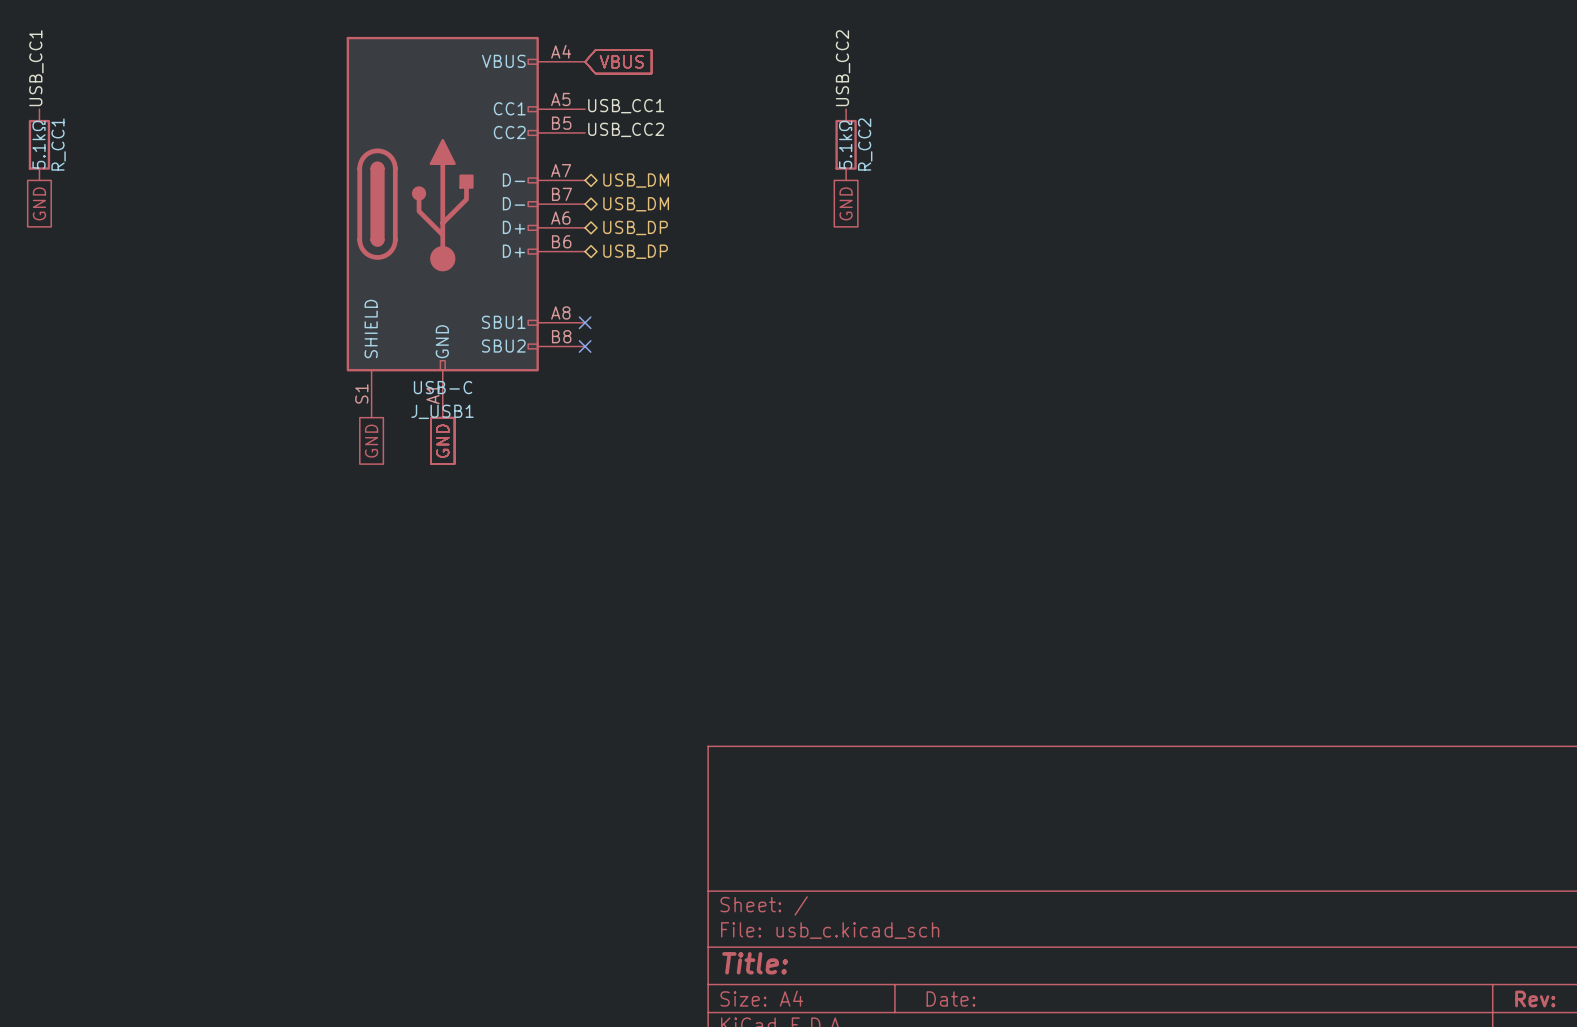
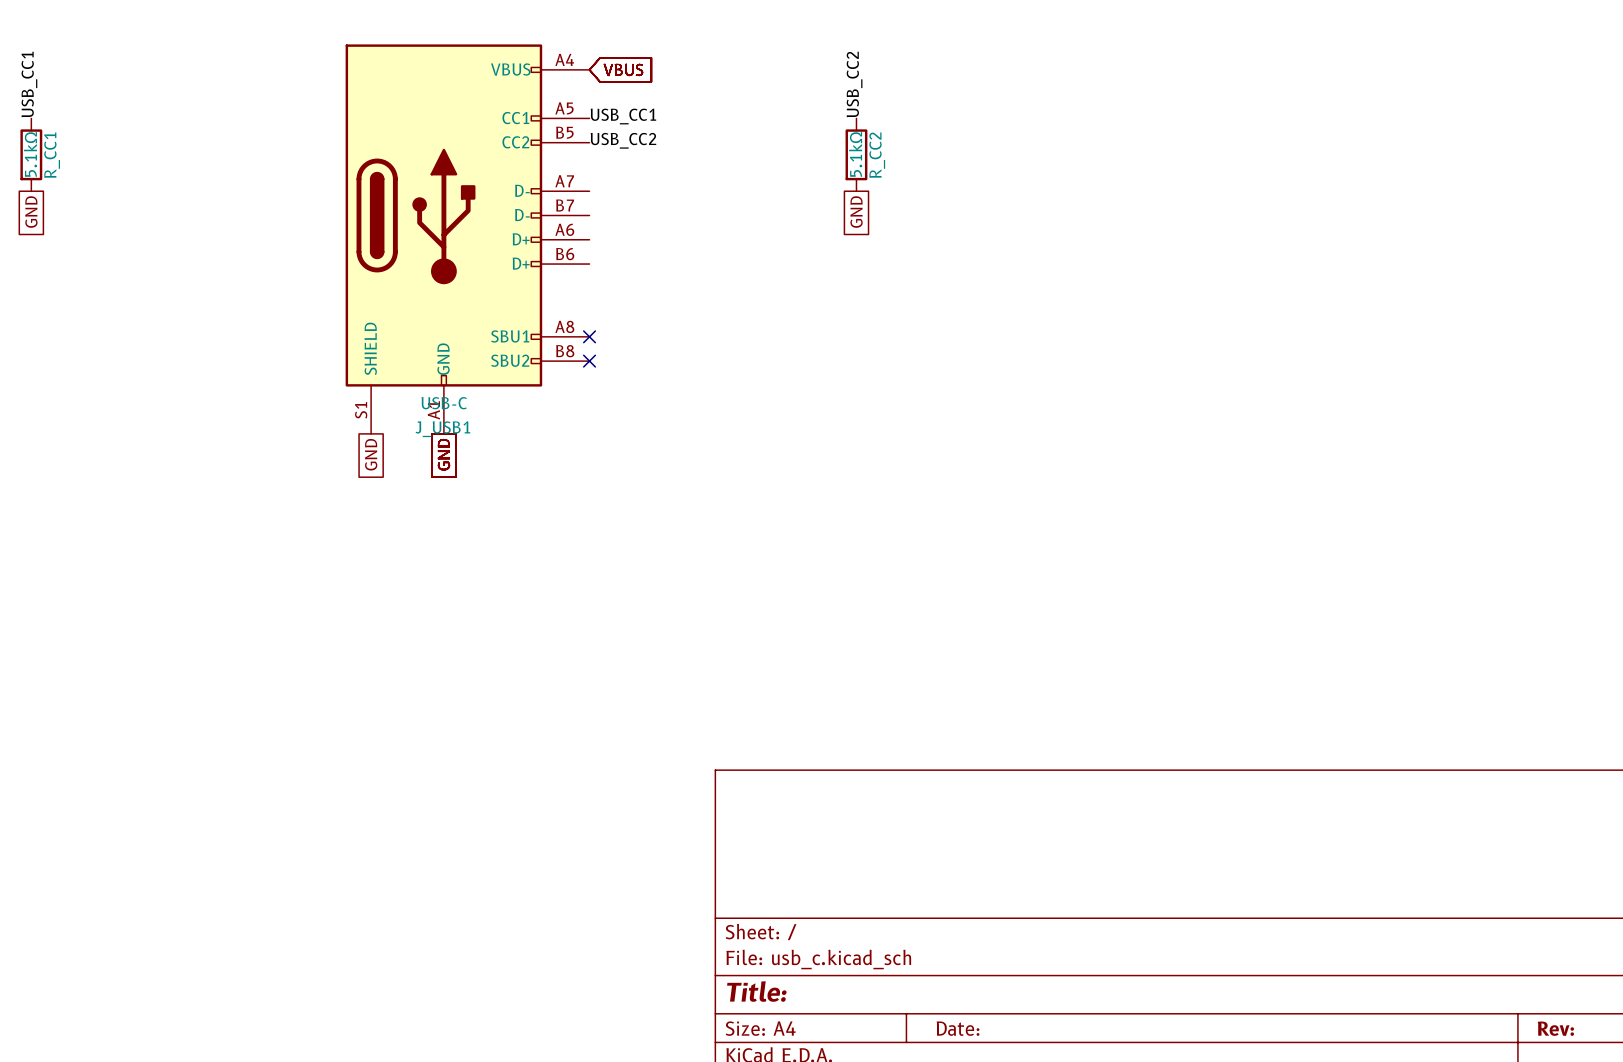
hierarchical label: USB_DM (636, 180) -> none
hierarchical label: USB_DM (636, 204) -> none
hierarchical label: USB_DP (635, 227) -> none
hierarchical label: USB_DP (635, 251) -> none

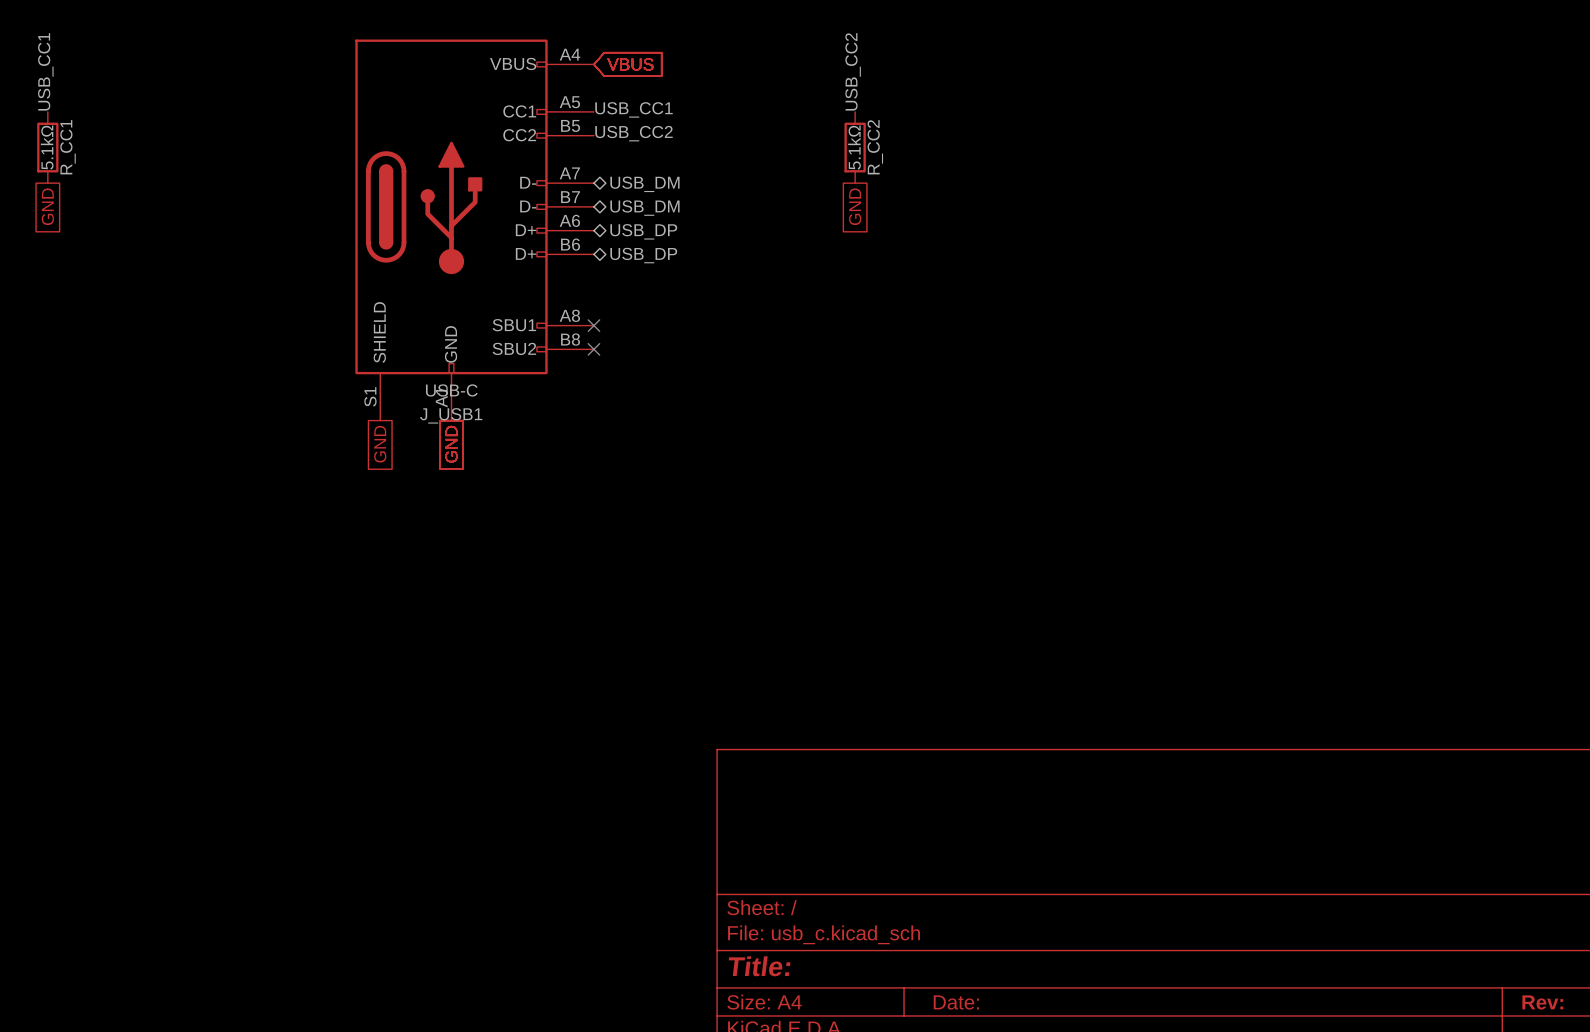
hierarchical label: none -> USB_DM (644, 184)
hierarchical label: none -> USB_DM (644, 208)
hierarchical label: none -> USB_DP (643, 231)
hierarchical label: none -> USB_DP (643, 255)

